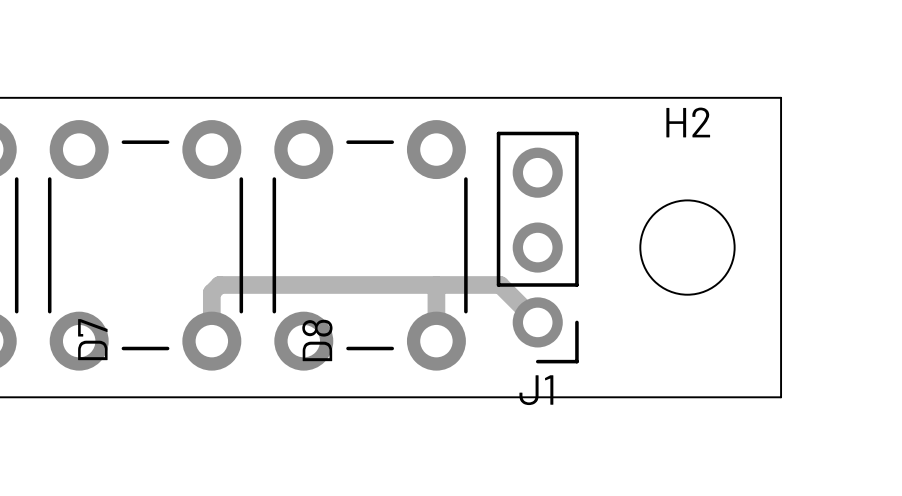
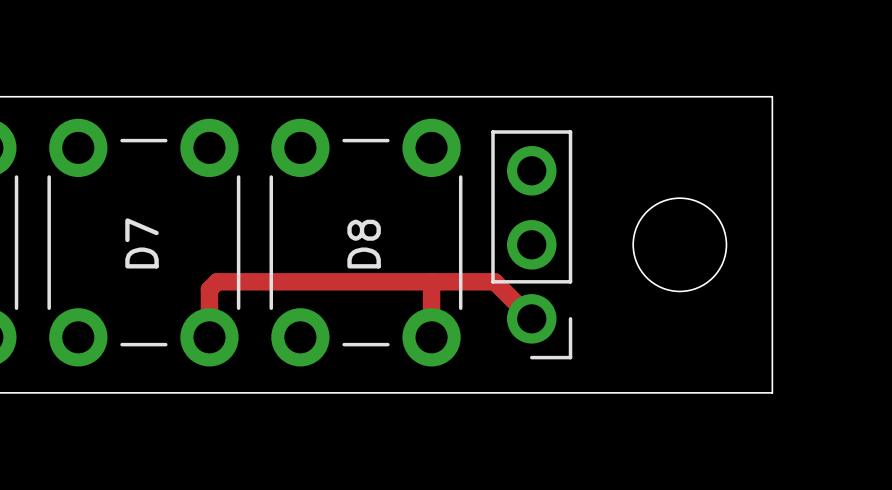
H2 name: H2 (688, 122) -> none
D7 name position: D7 (92, 339) -> D7 (142, 243)
D8 name position: D8 (317, 340) -> D8 (364, 244)
J1 name: J1 (536, 390) -> none

